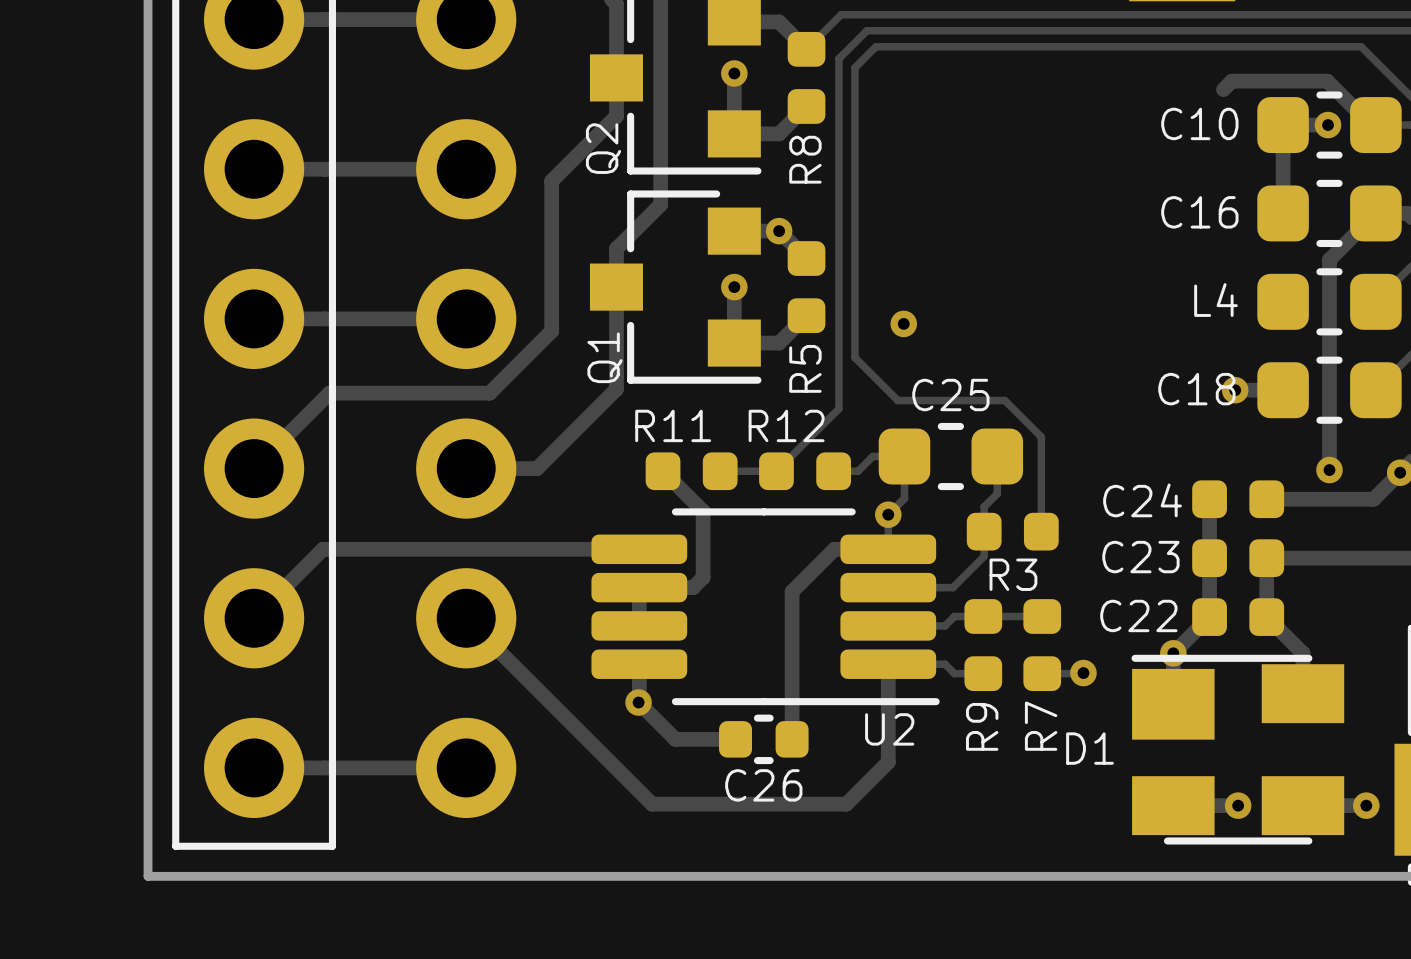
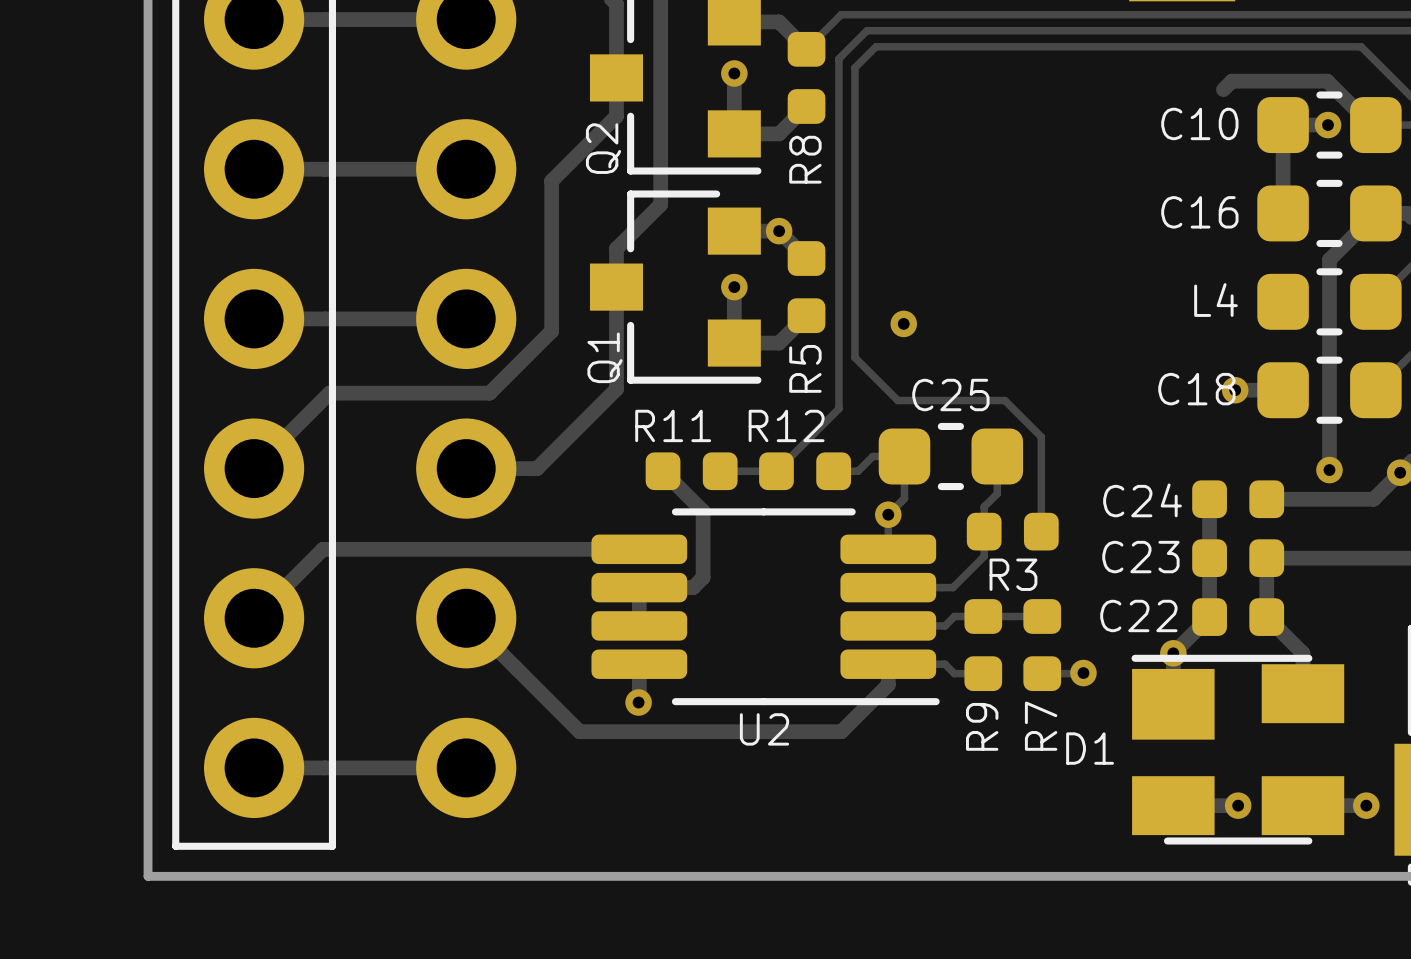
track: (888, 549) (834, 549) (792, 591) (792, 739) -> none
track: (888, 684) (888, 762) (846, 804) (652, 804) (579, 731) -> (888, 684) (841, 731) (579, 731)
track: (638, 702) (675, 739) (735, 739) -> none
U2 name position: U2 (889, 729) -> U2 (764, 729)
C26: (763, 739) -> none

